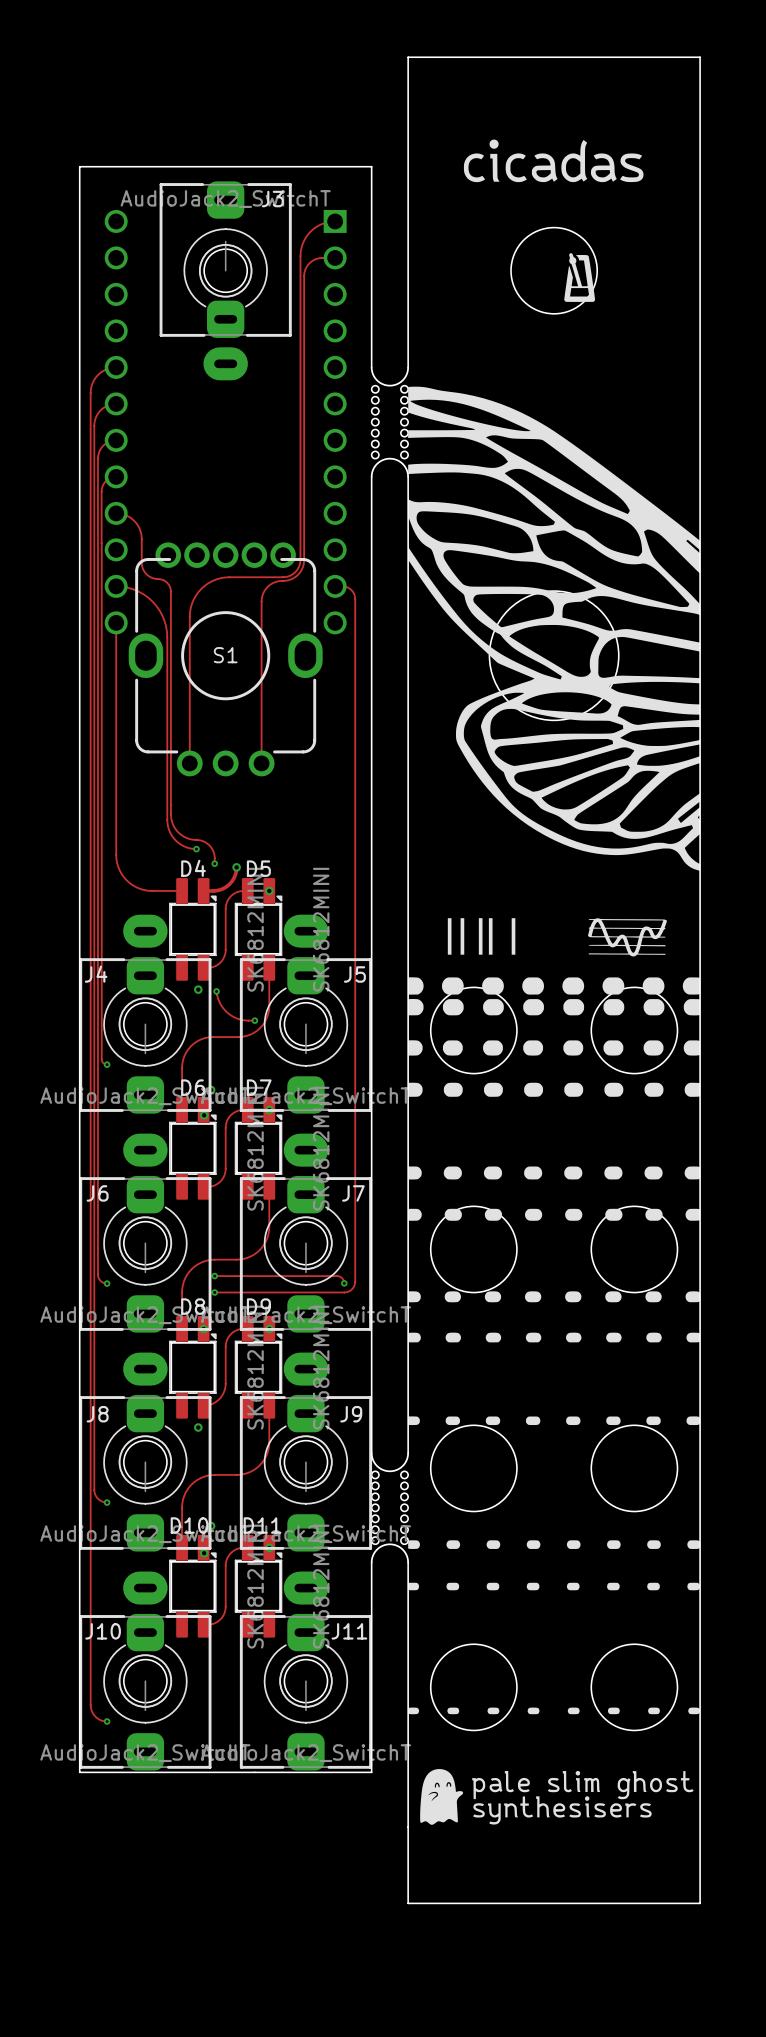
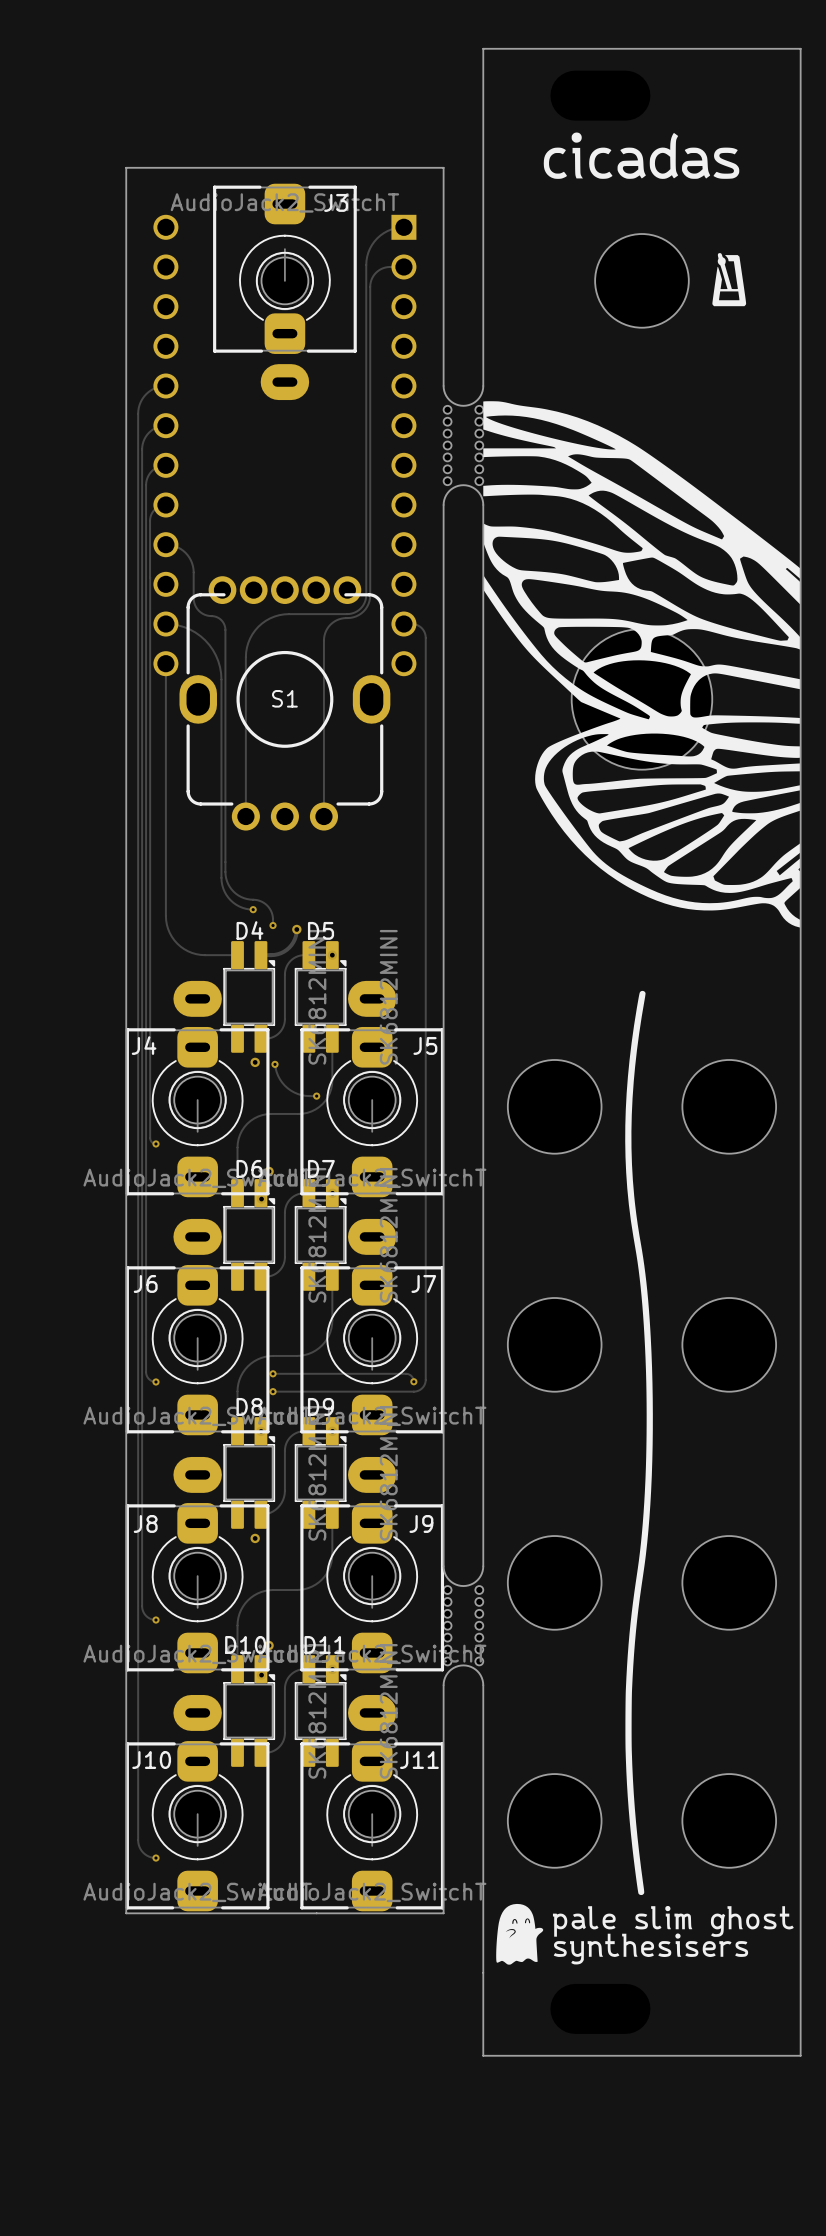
drawing shape: [408, 139, 701, 1825] -> [483, 132, 801, 1965]

